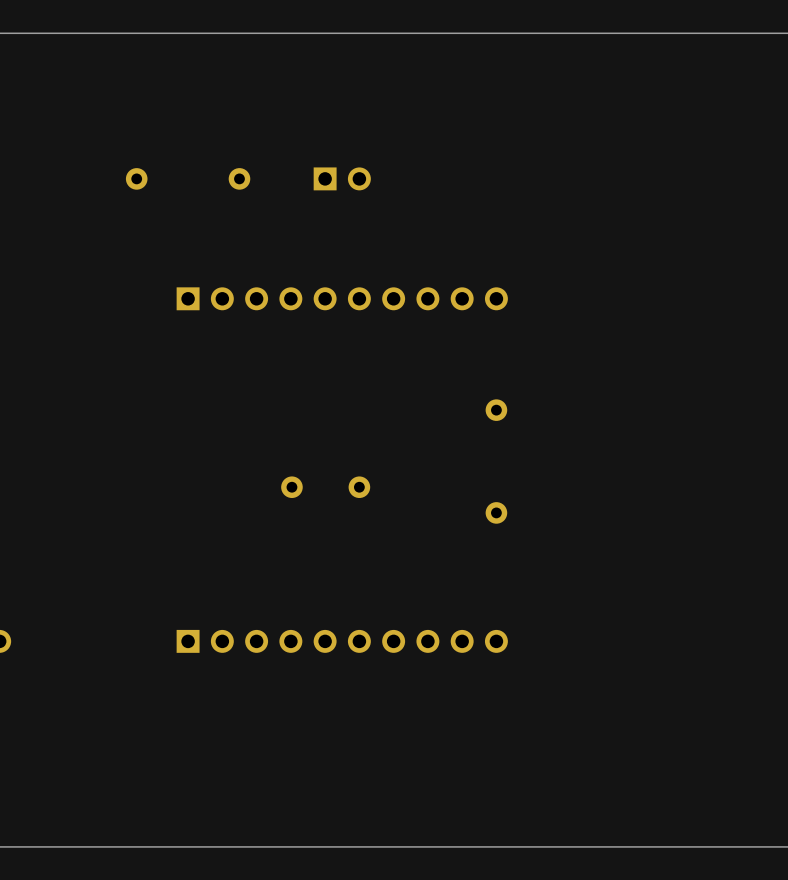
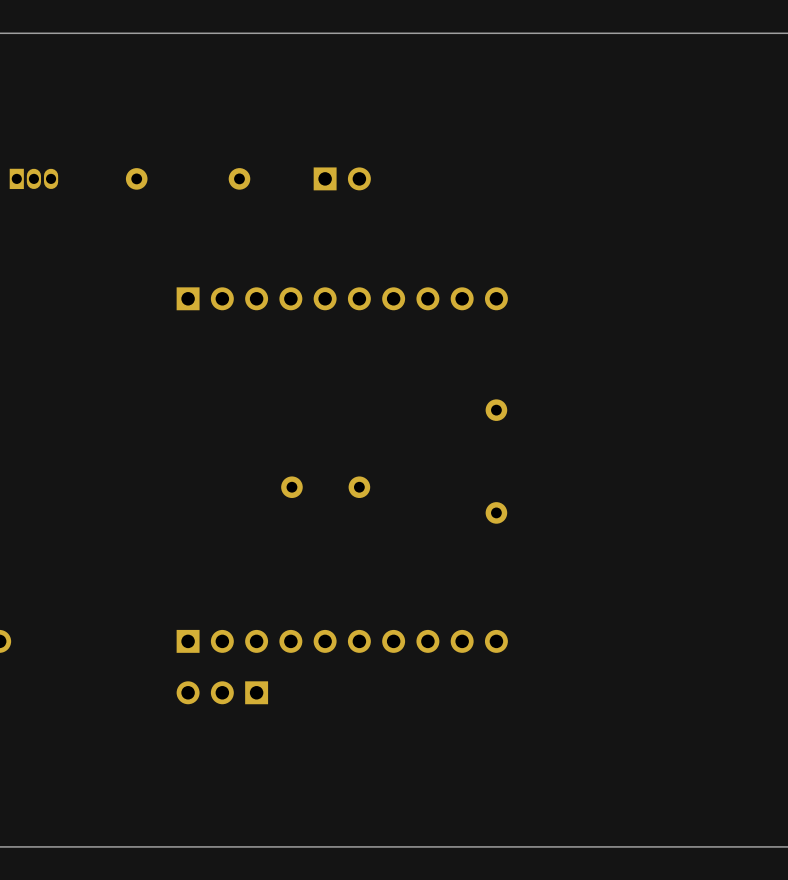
part: none -> (33, 178)
part: none -> (222, 692)

